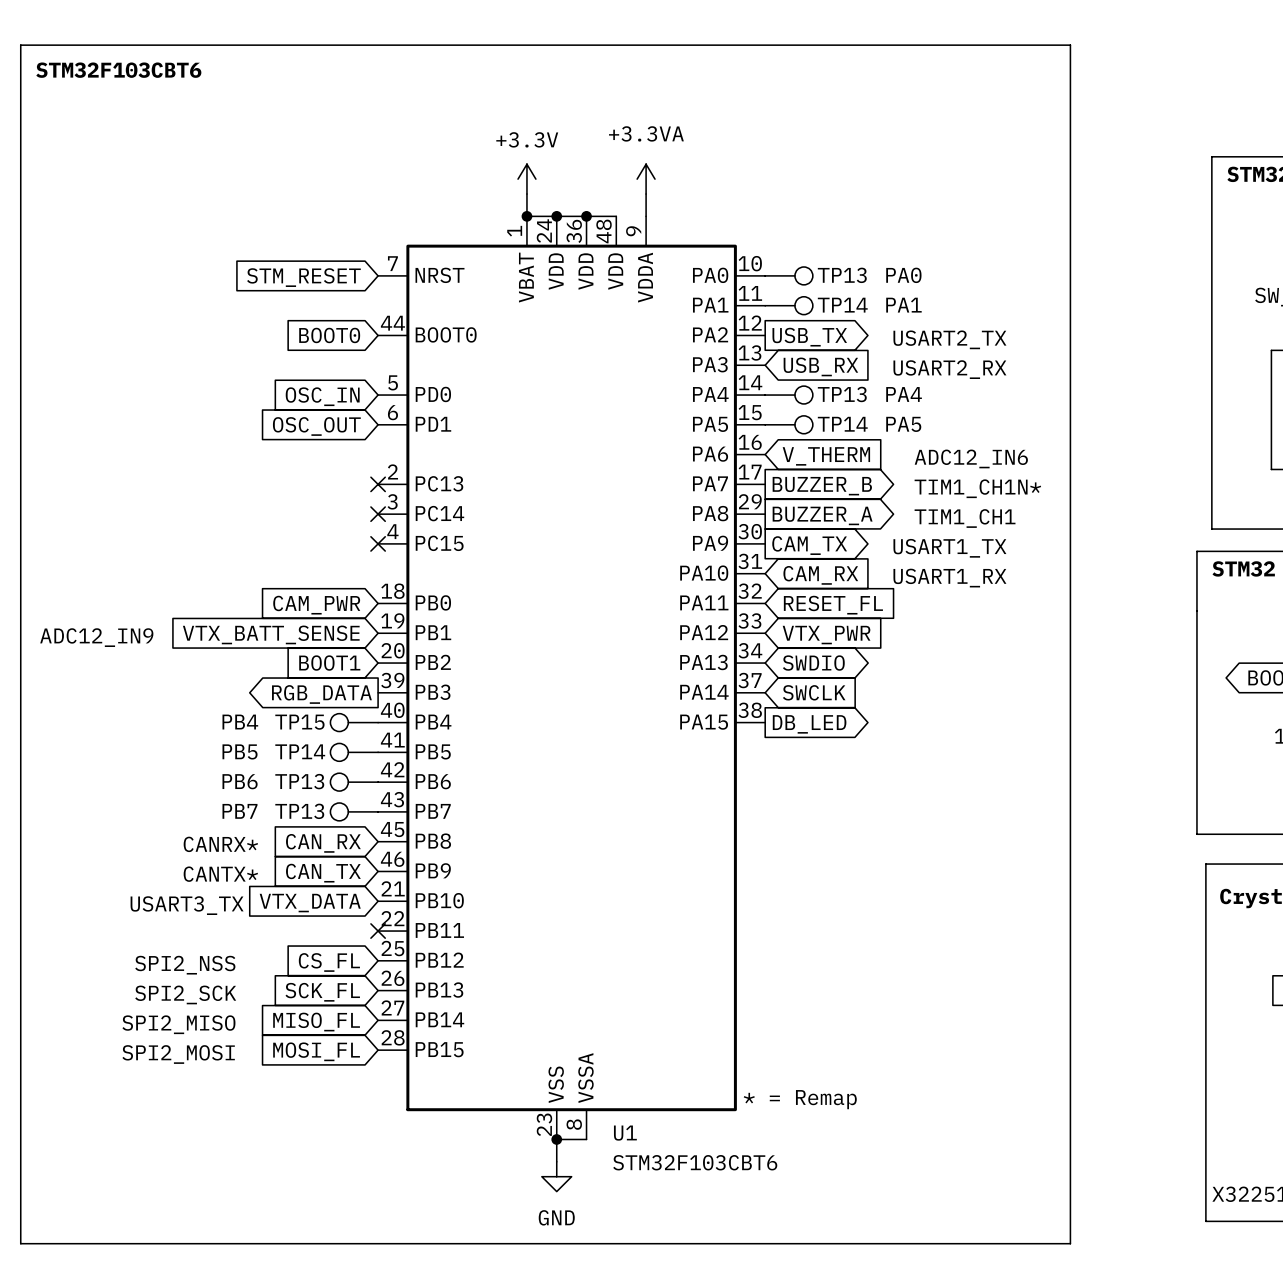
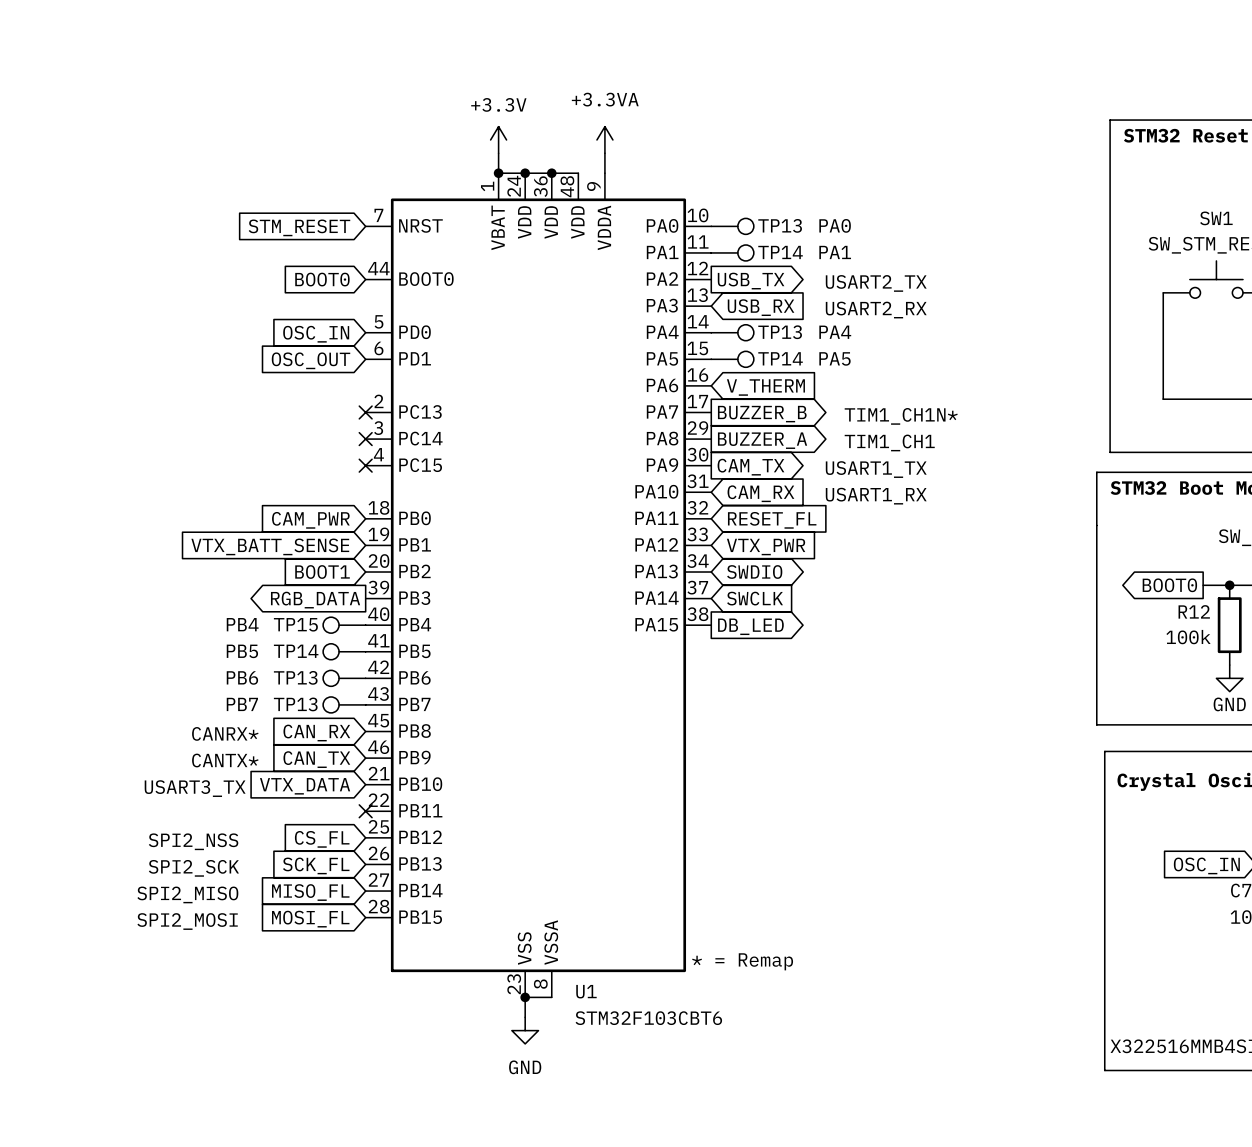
line: (20, 45) (1070, 45) (1070, 1243) (20, 1243) (20, 45) -> none
text: STM32F103CBT6 (118, 70) -> none
text: ADC12_IN6 (971, 458) -> none
text: ADC12_IN9 (96, 637) -> none

